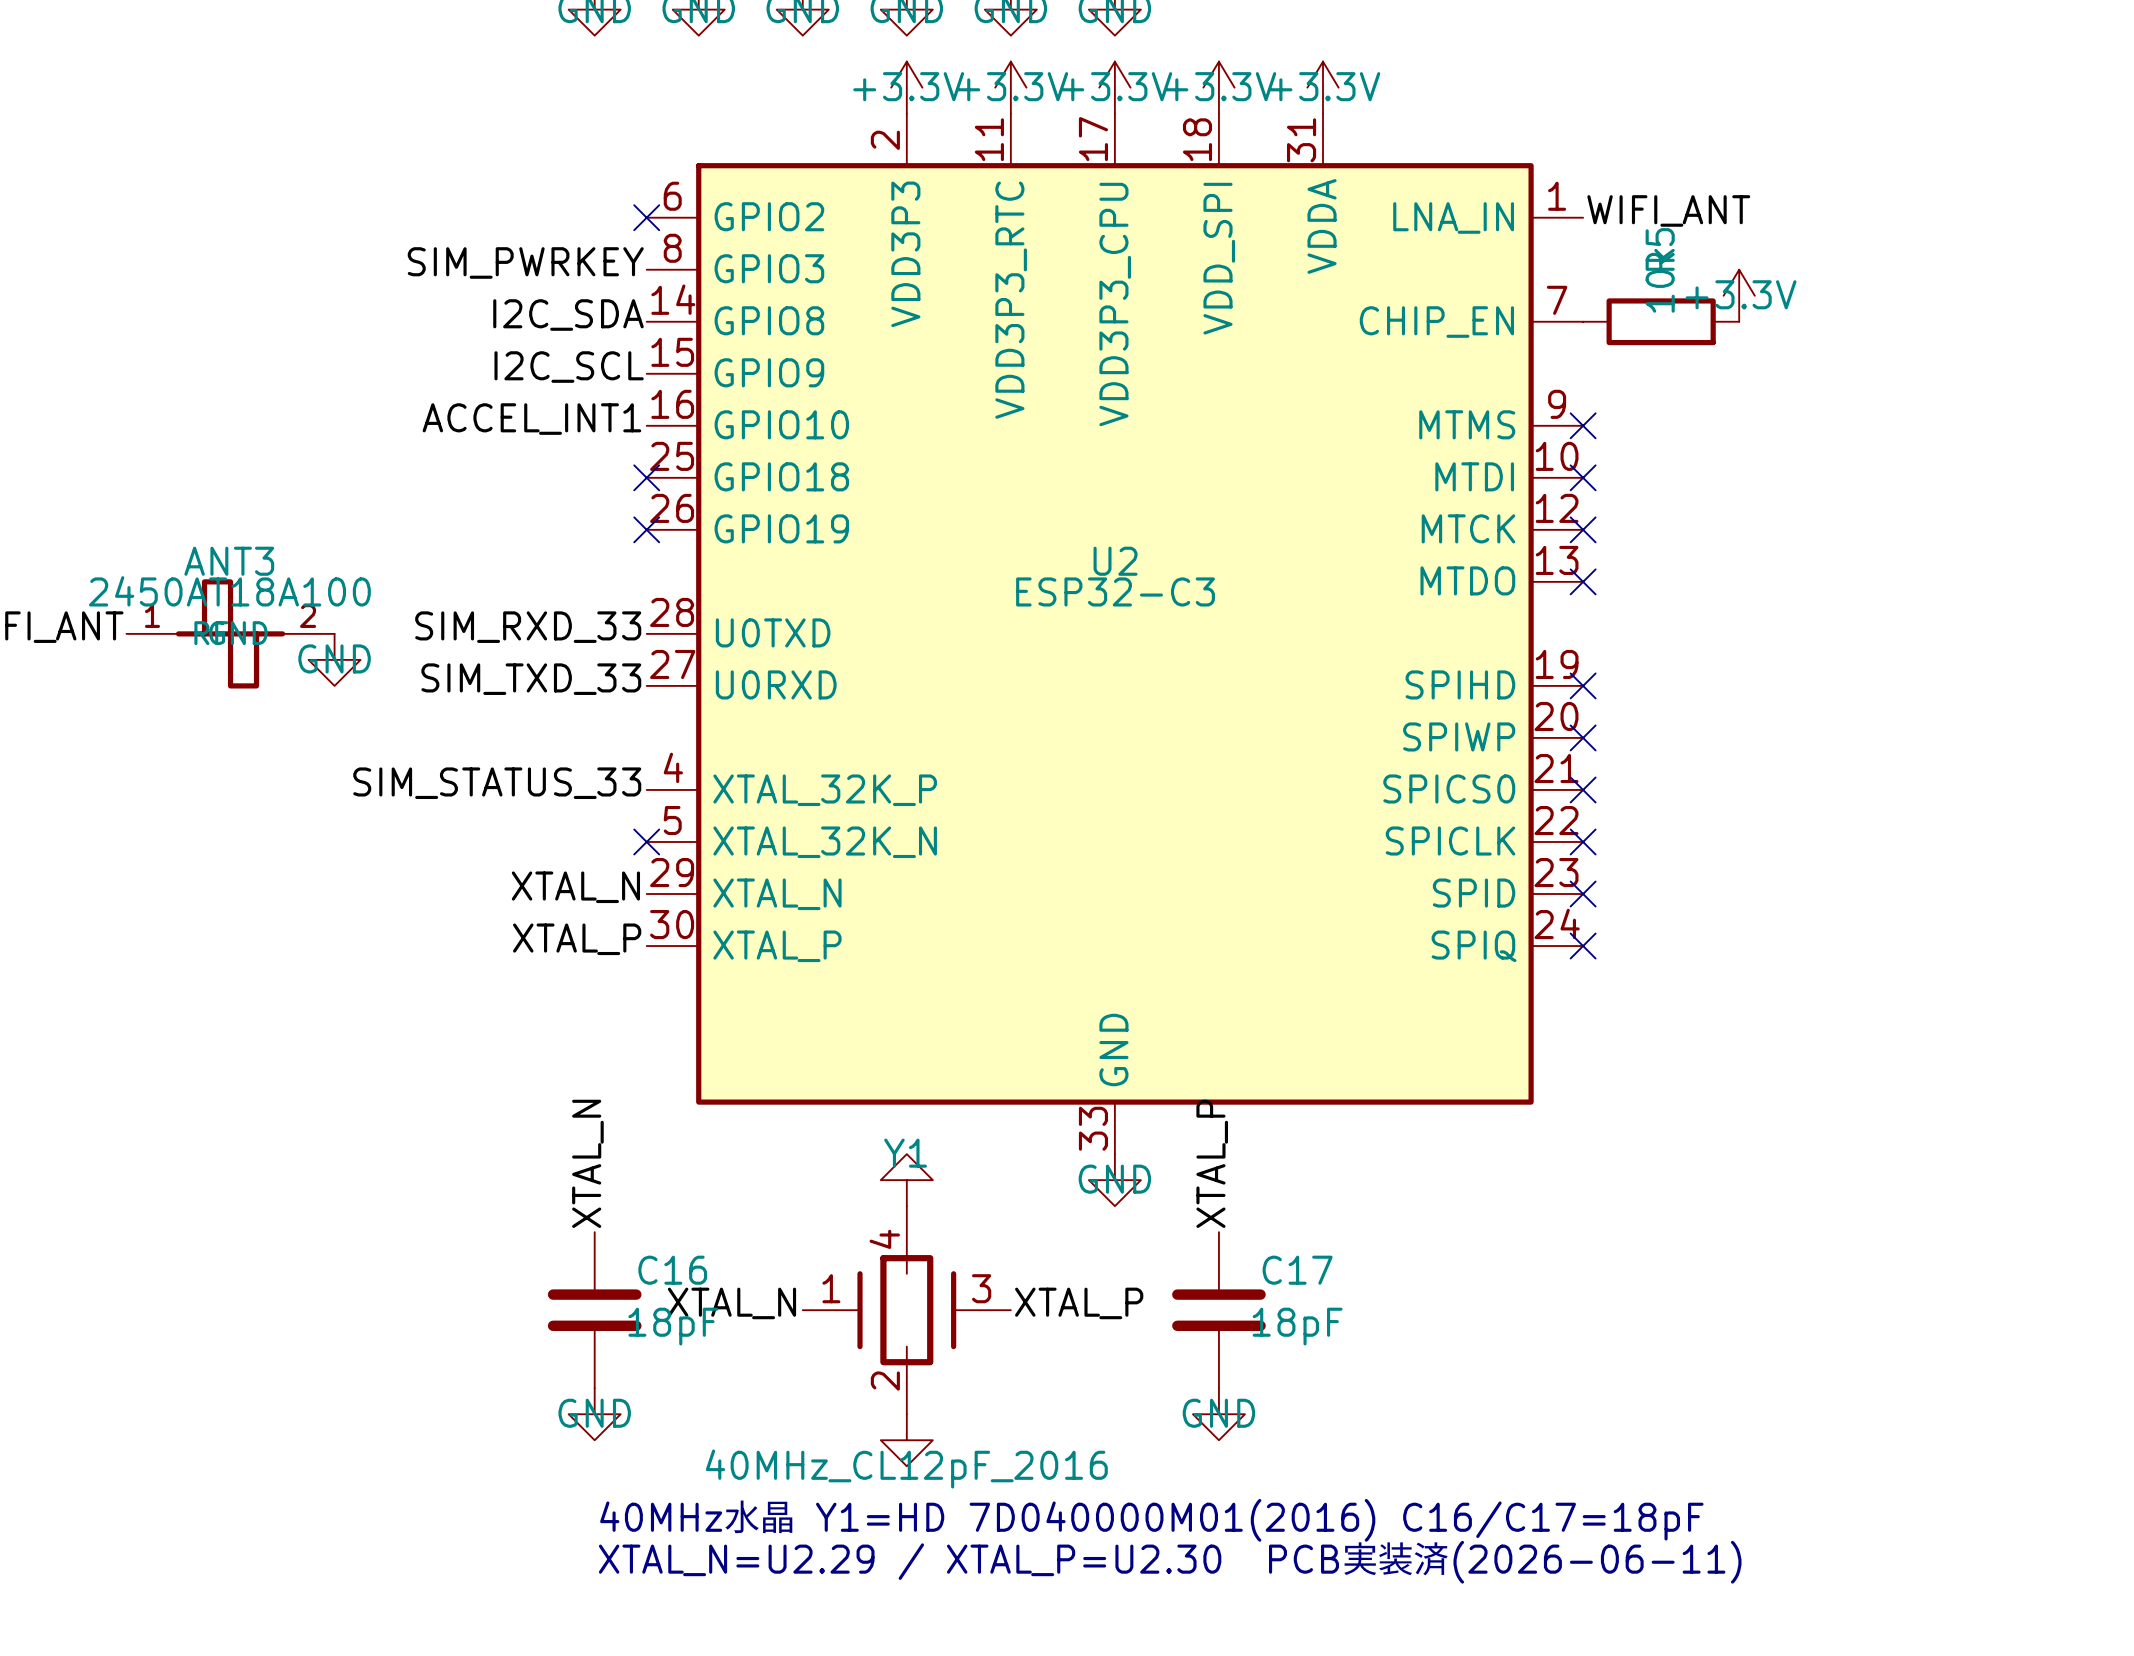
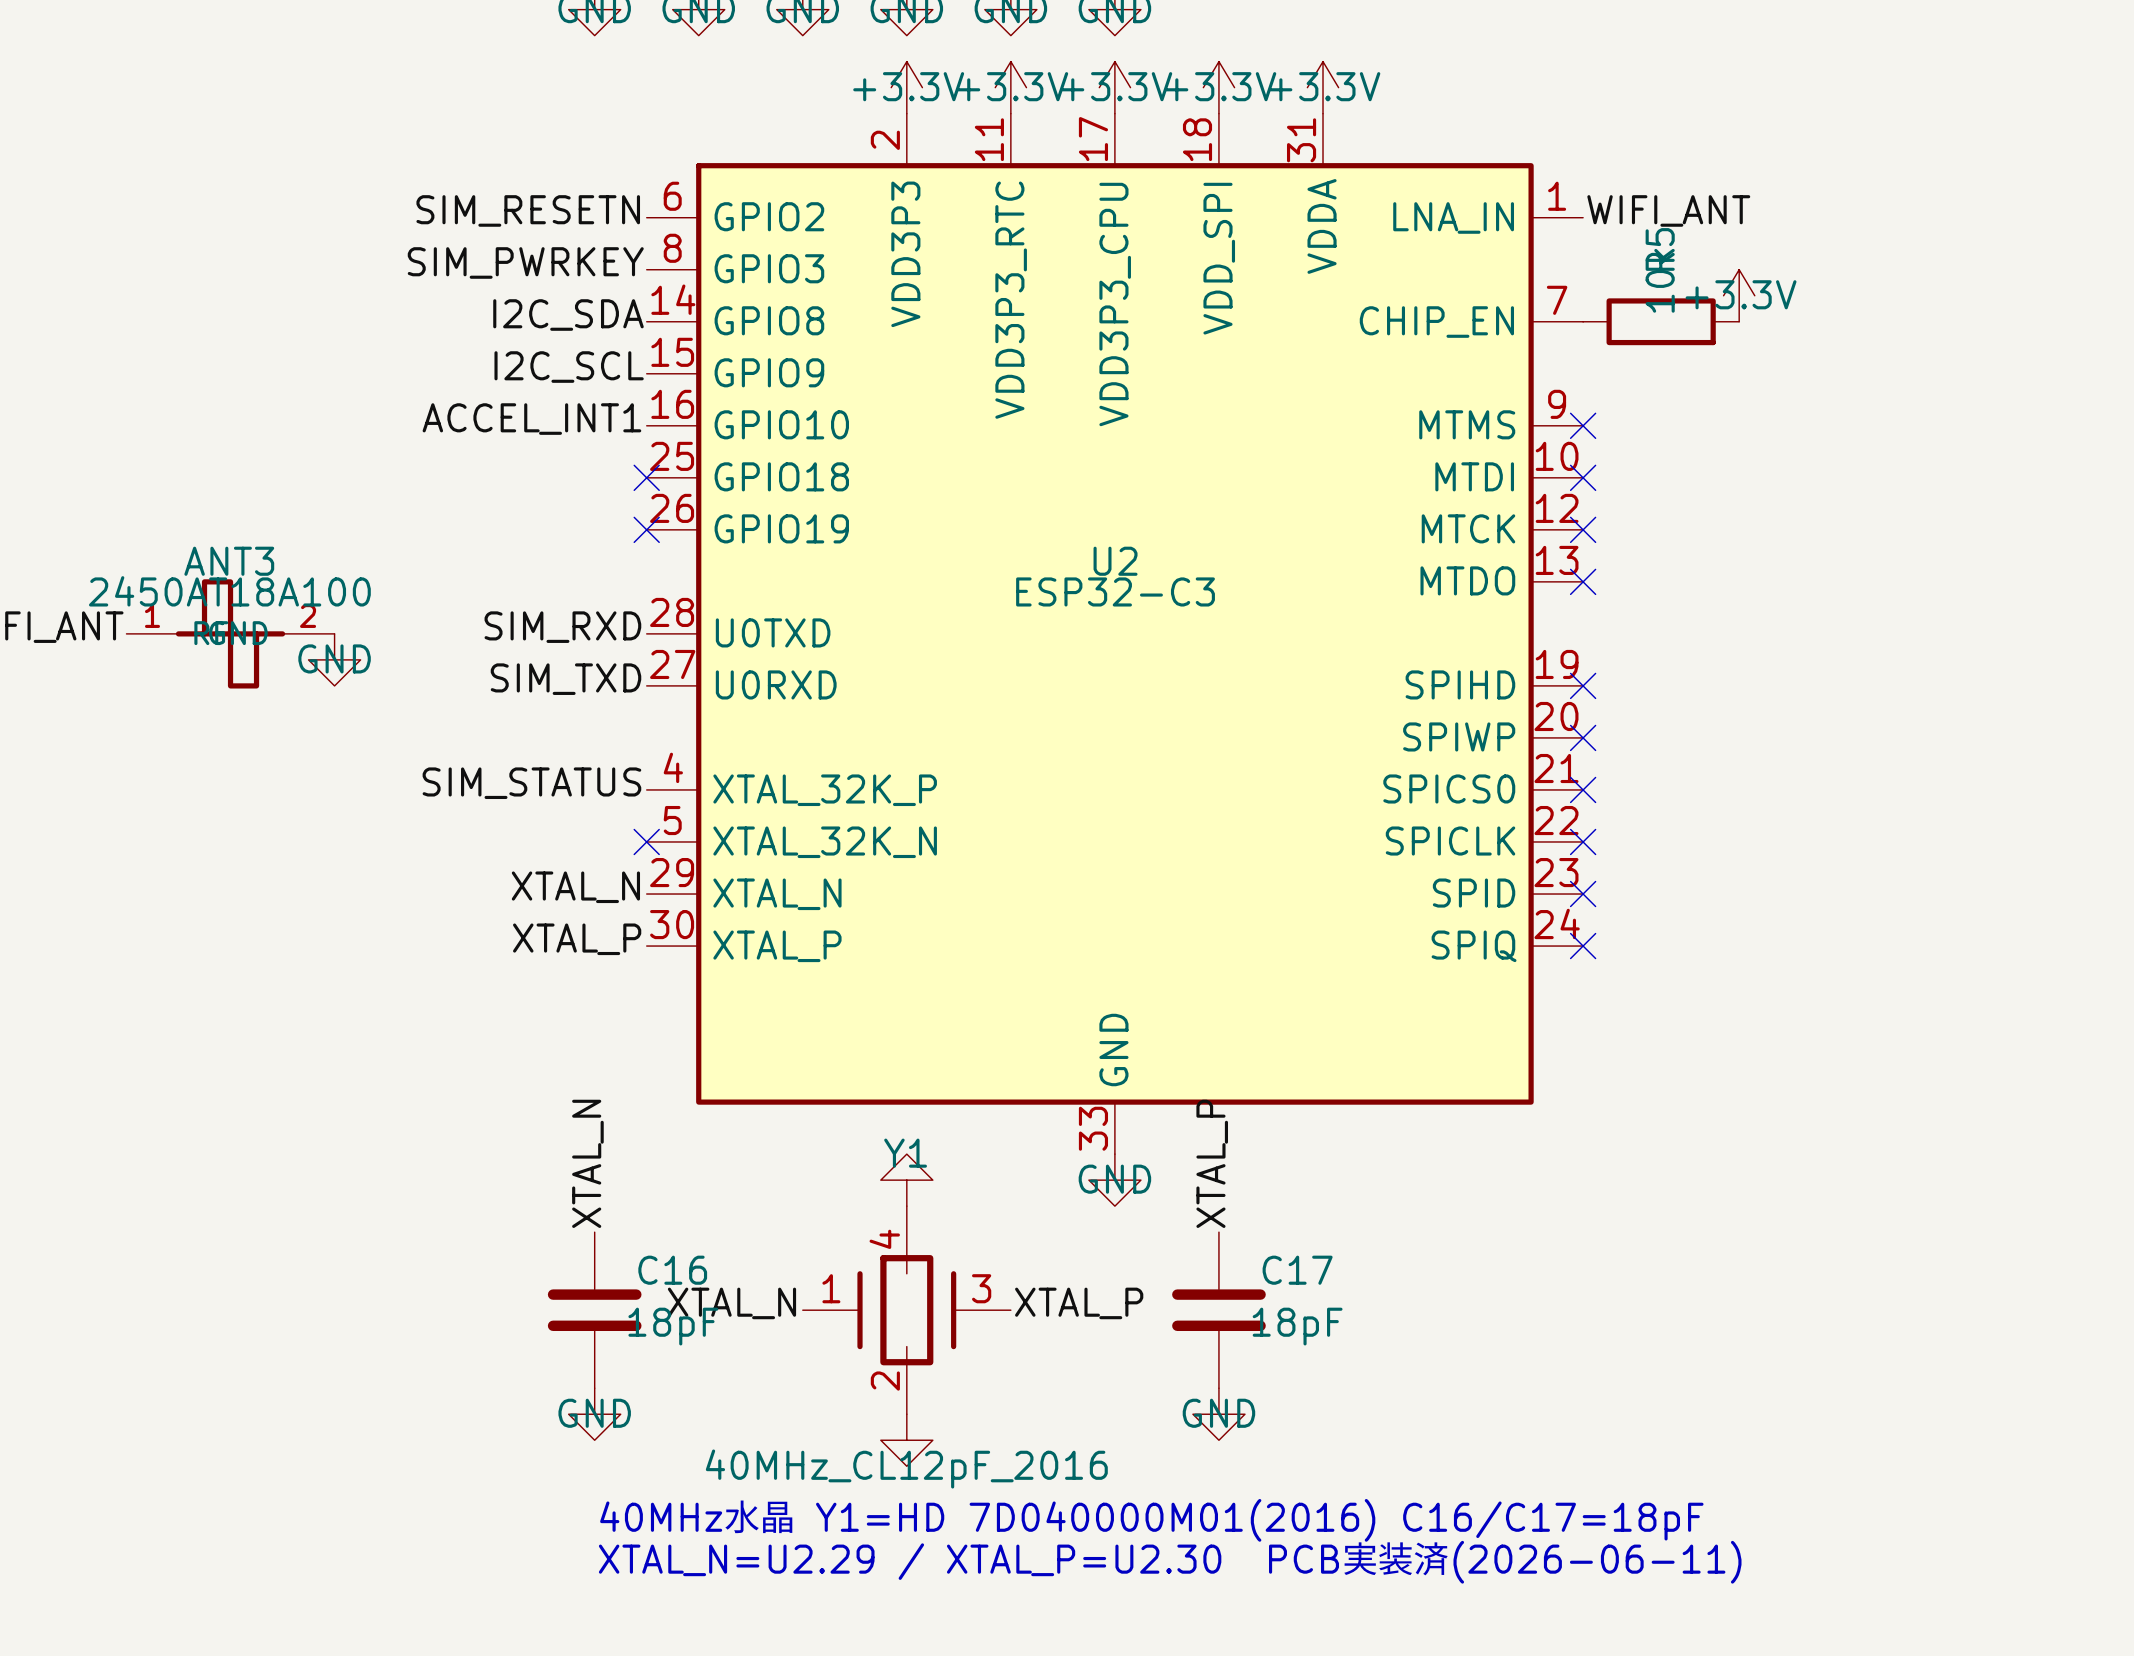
label: none -> SIM_RESETN (528, 210)
no-connect mark: (646, 217) -> none
label: SIM_RXD_33 (528, 627) -> SIM_RXD (562, 627)
label: SIM_TXD_33 (531, 679) -> SIM_TXD (566, 679)
label: SIM_STATUS_33 (497, 783) -> SIM_STATUS (531, 783)

